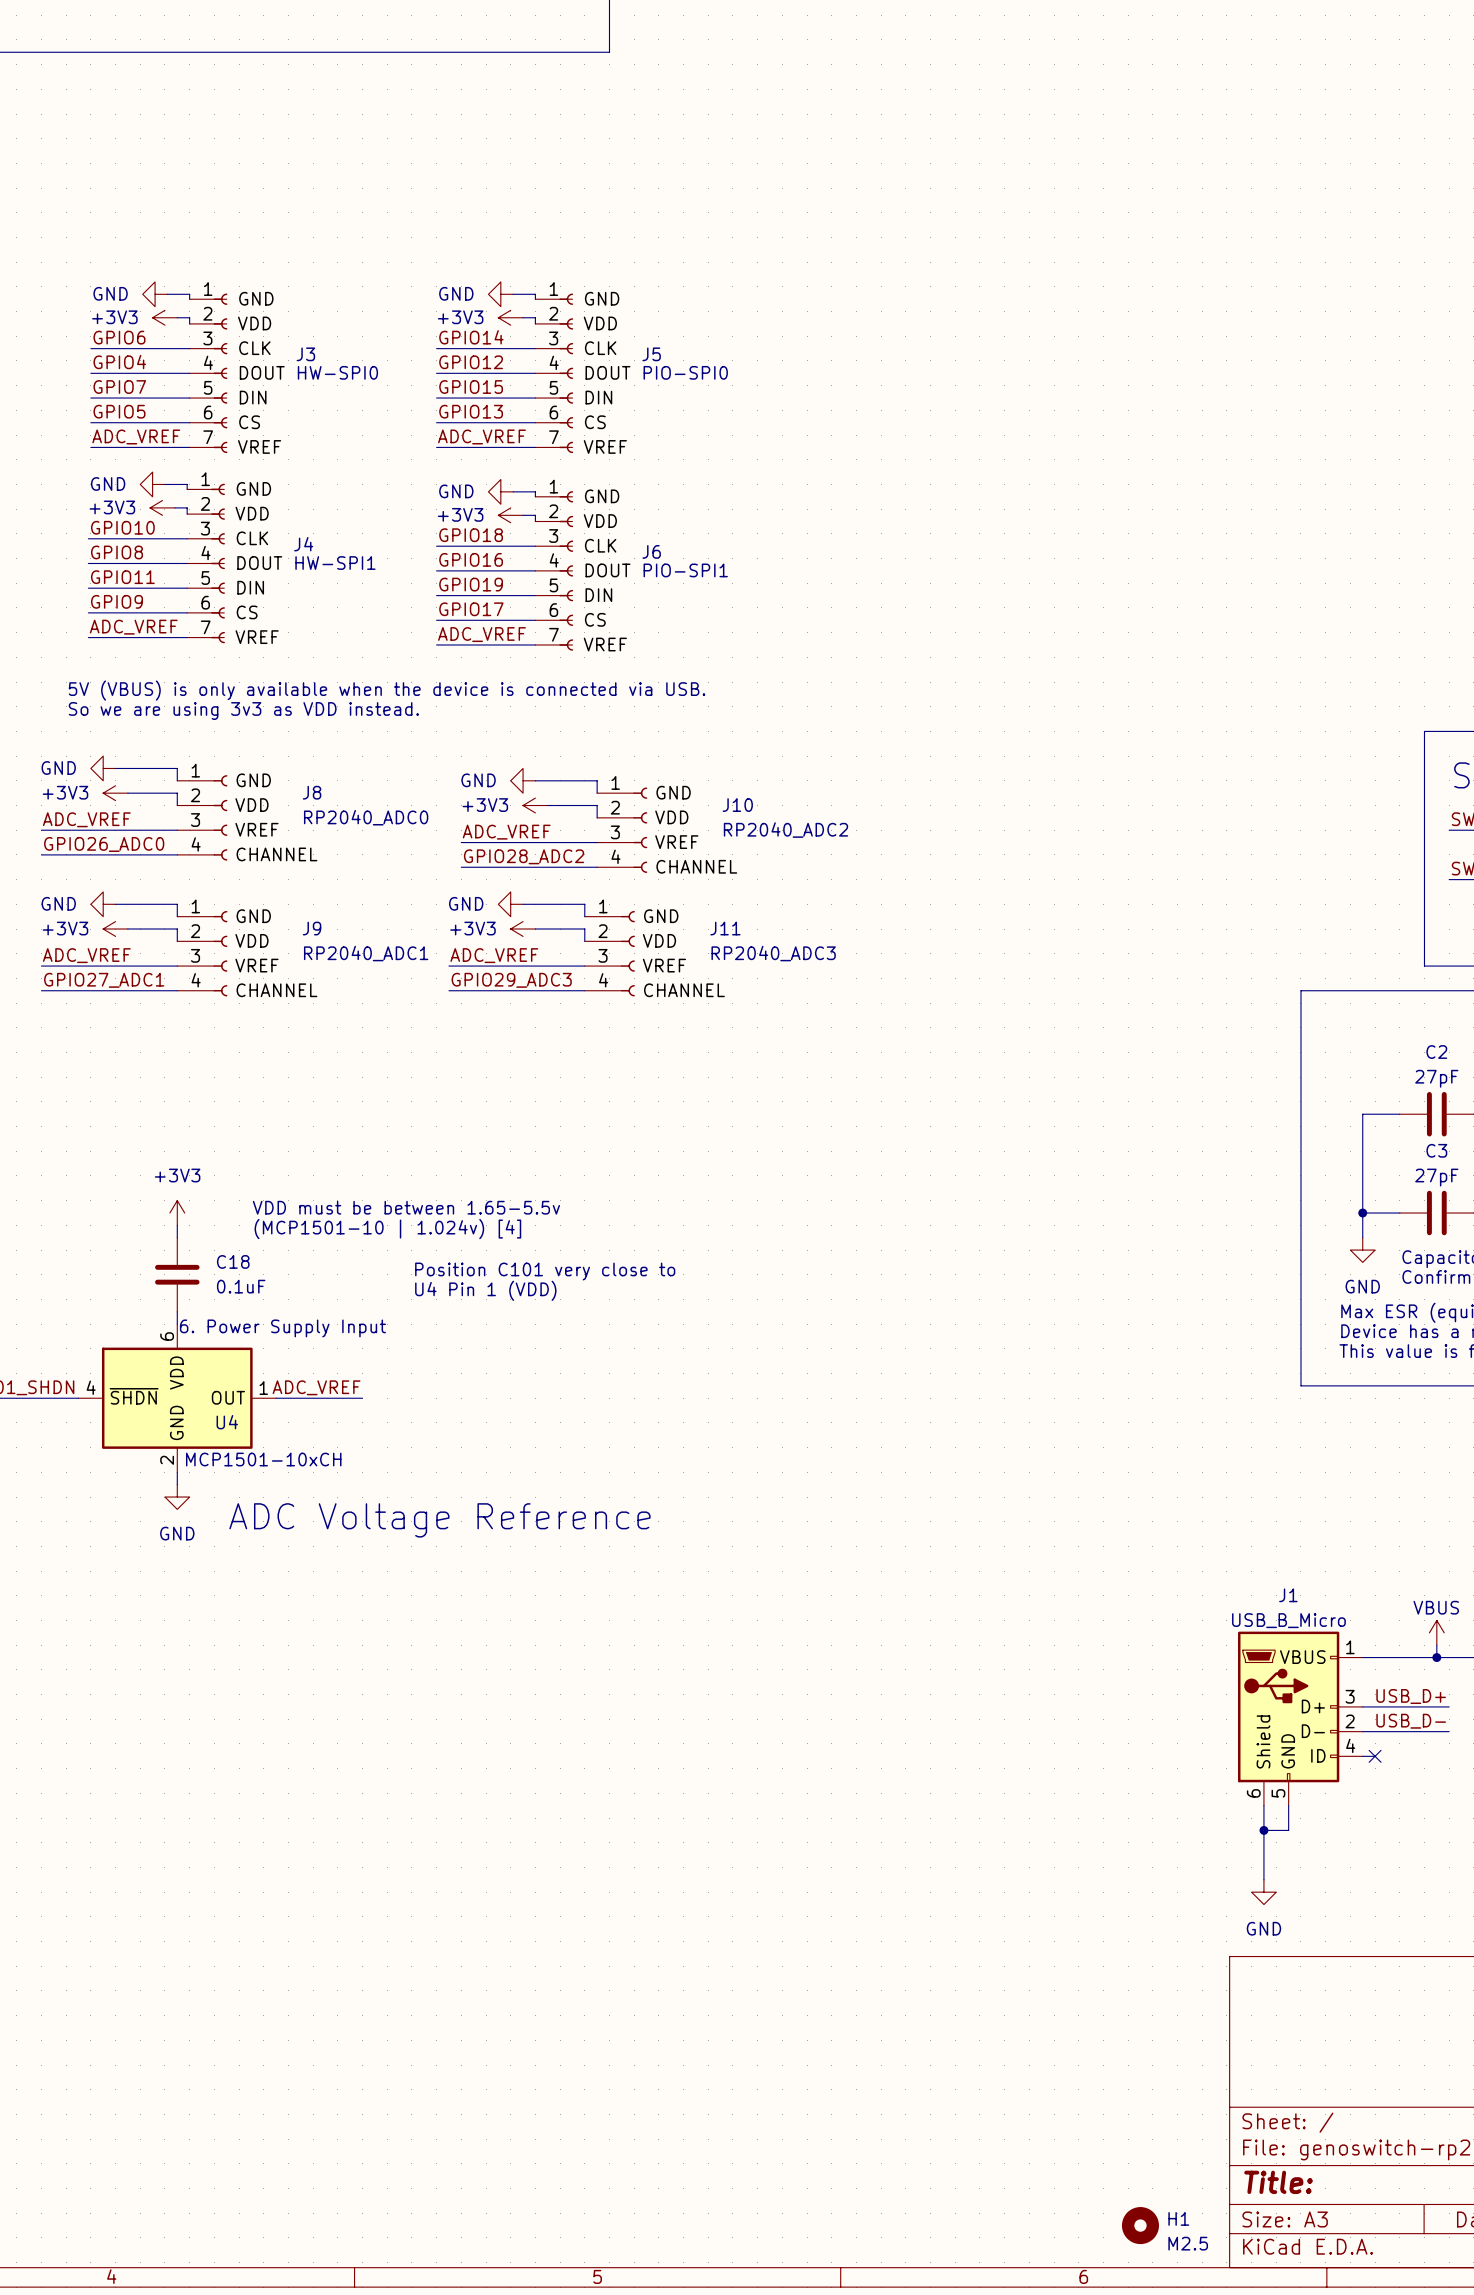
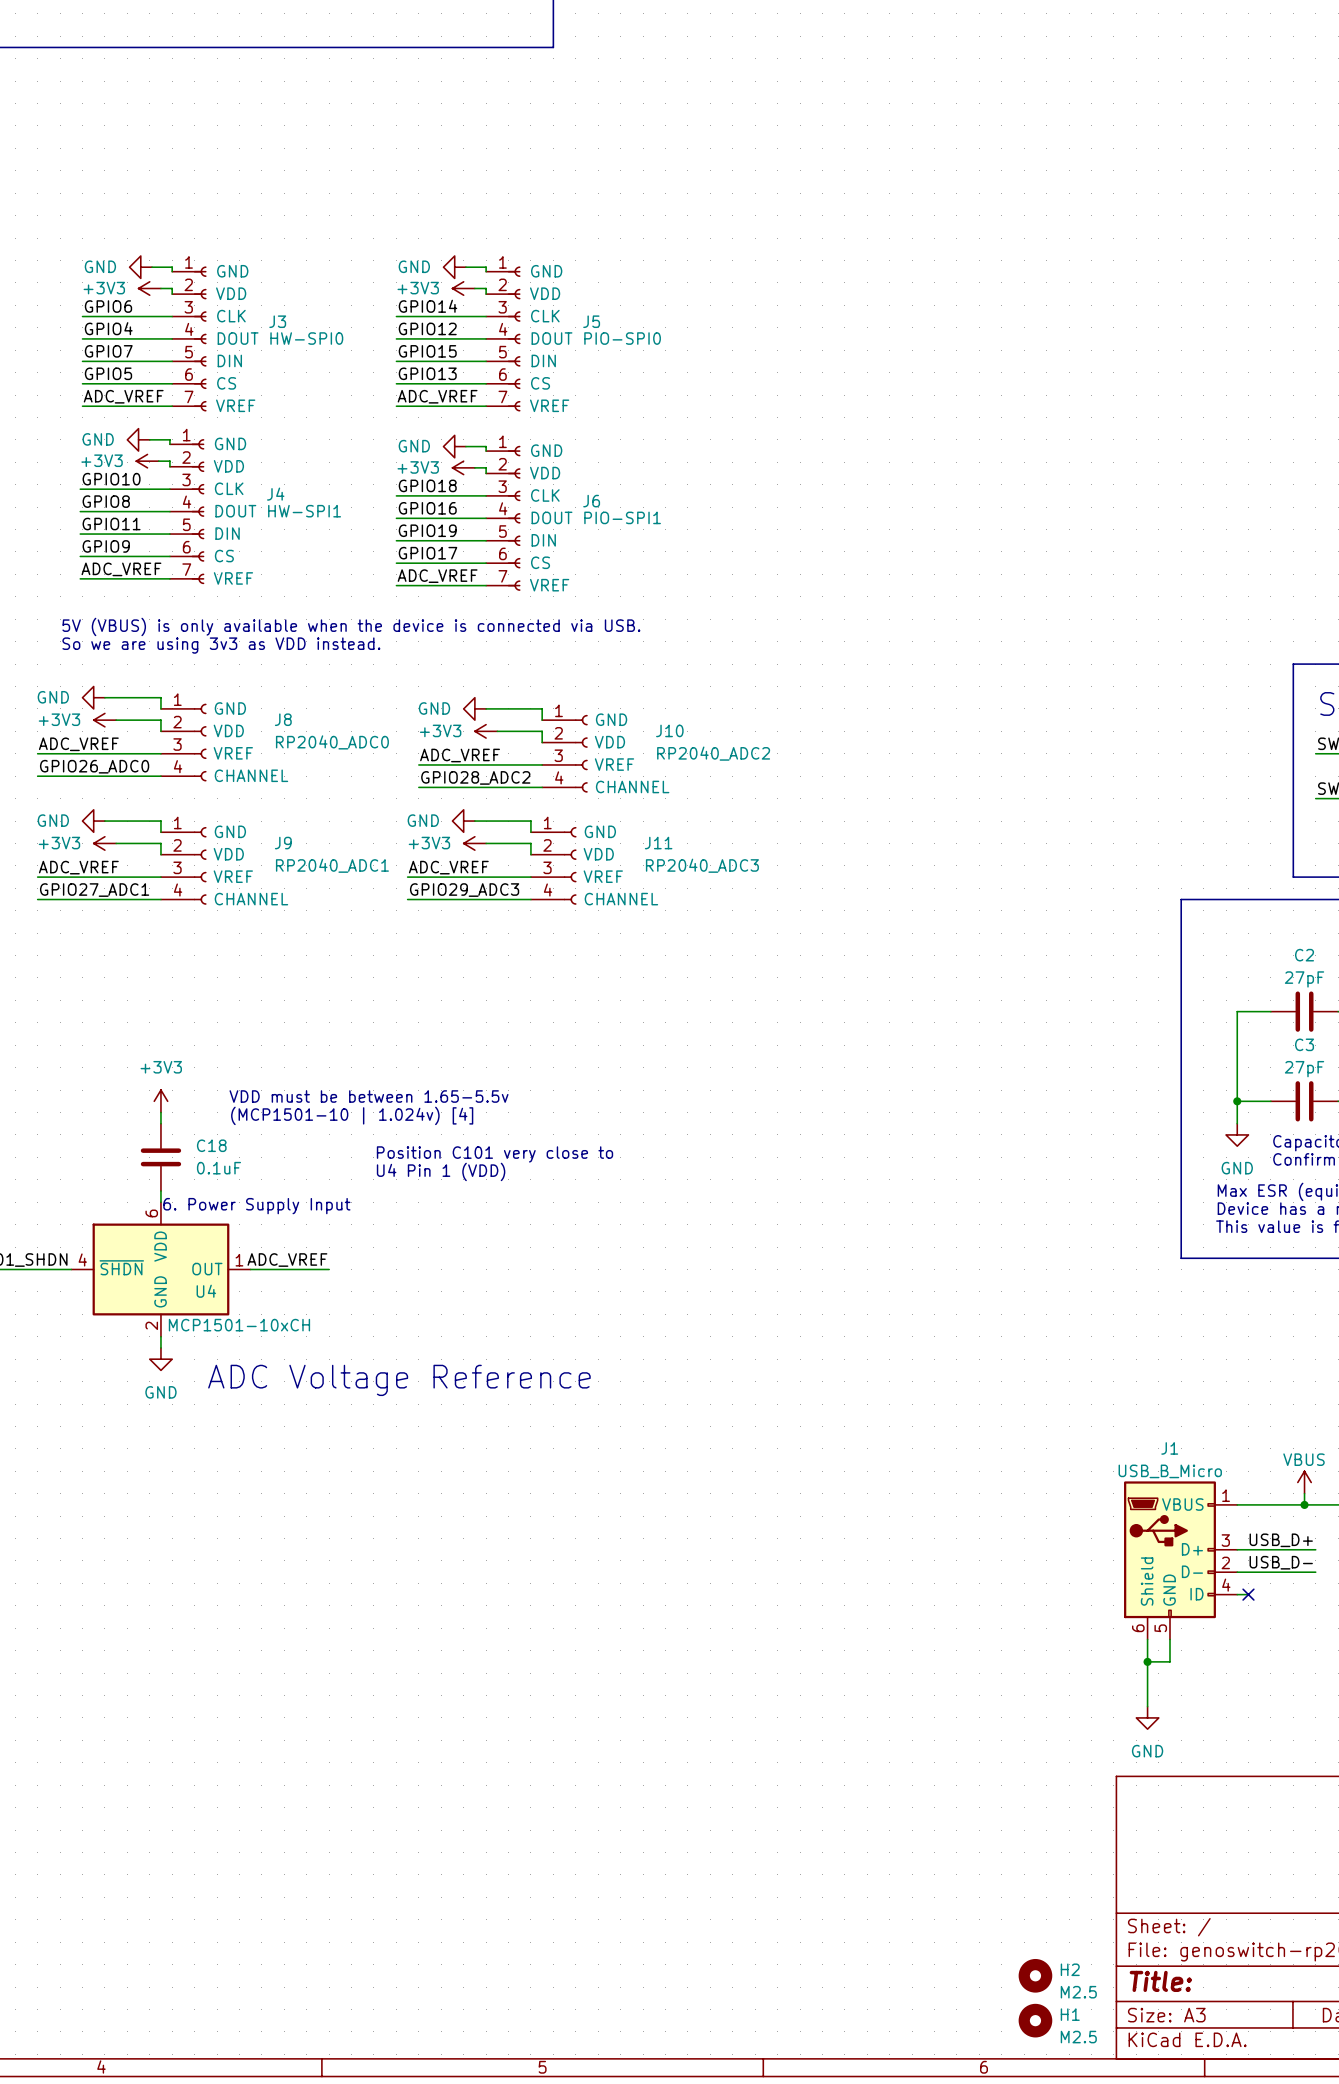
H2: none -> M2.5 (1035, 1975)

